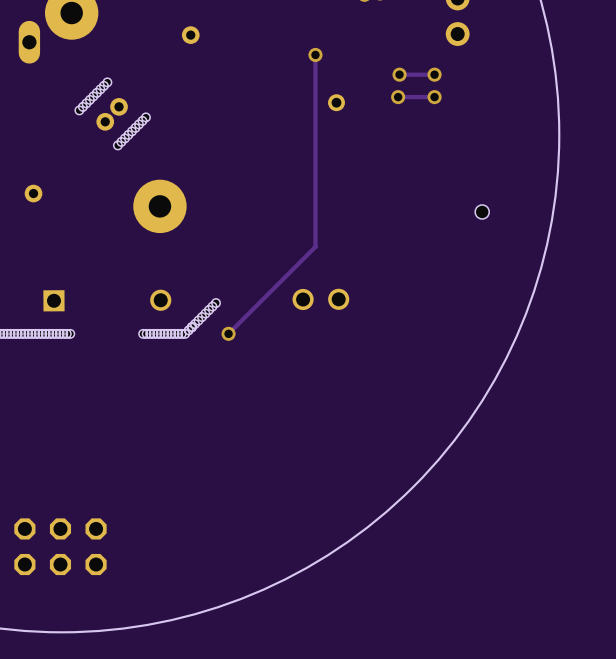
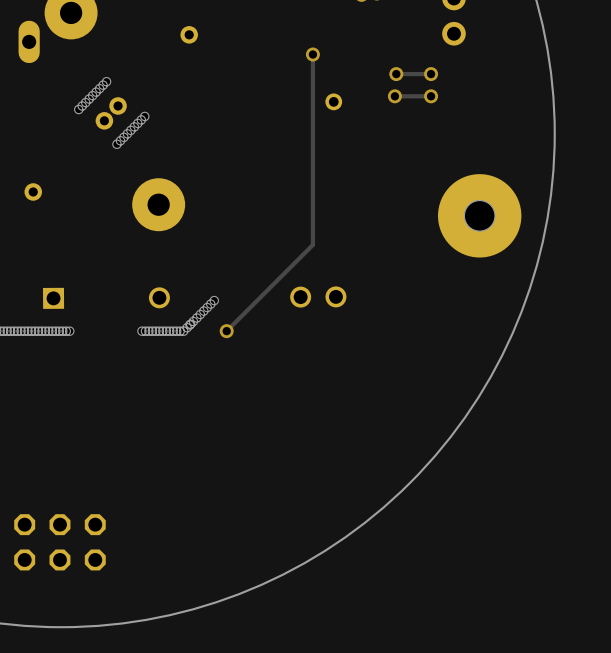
hole: (482, 211) -> none
part: none -> (479, 215)

